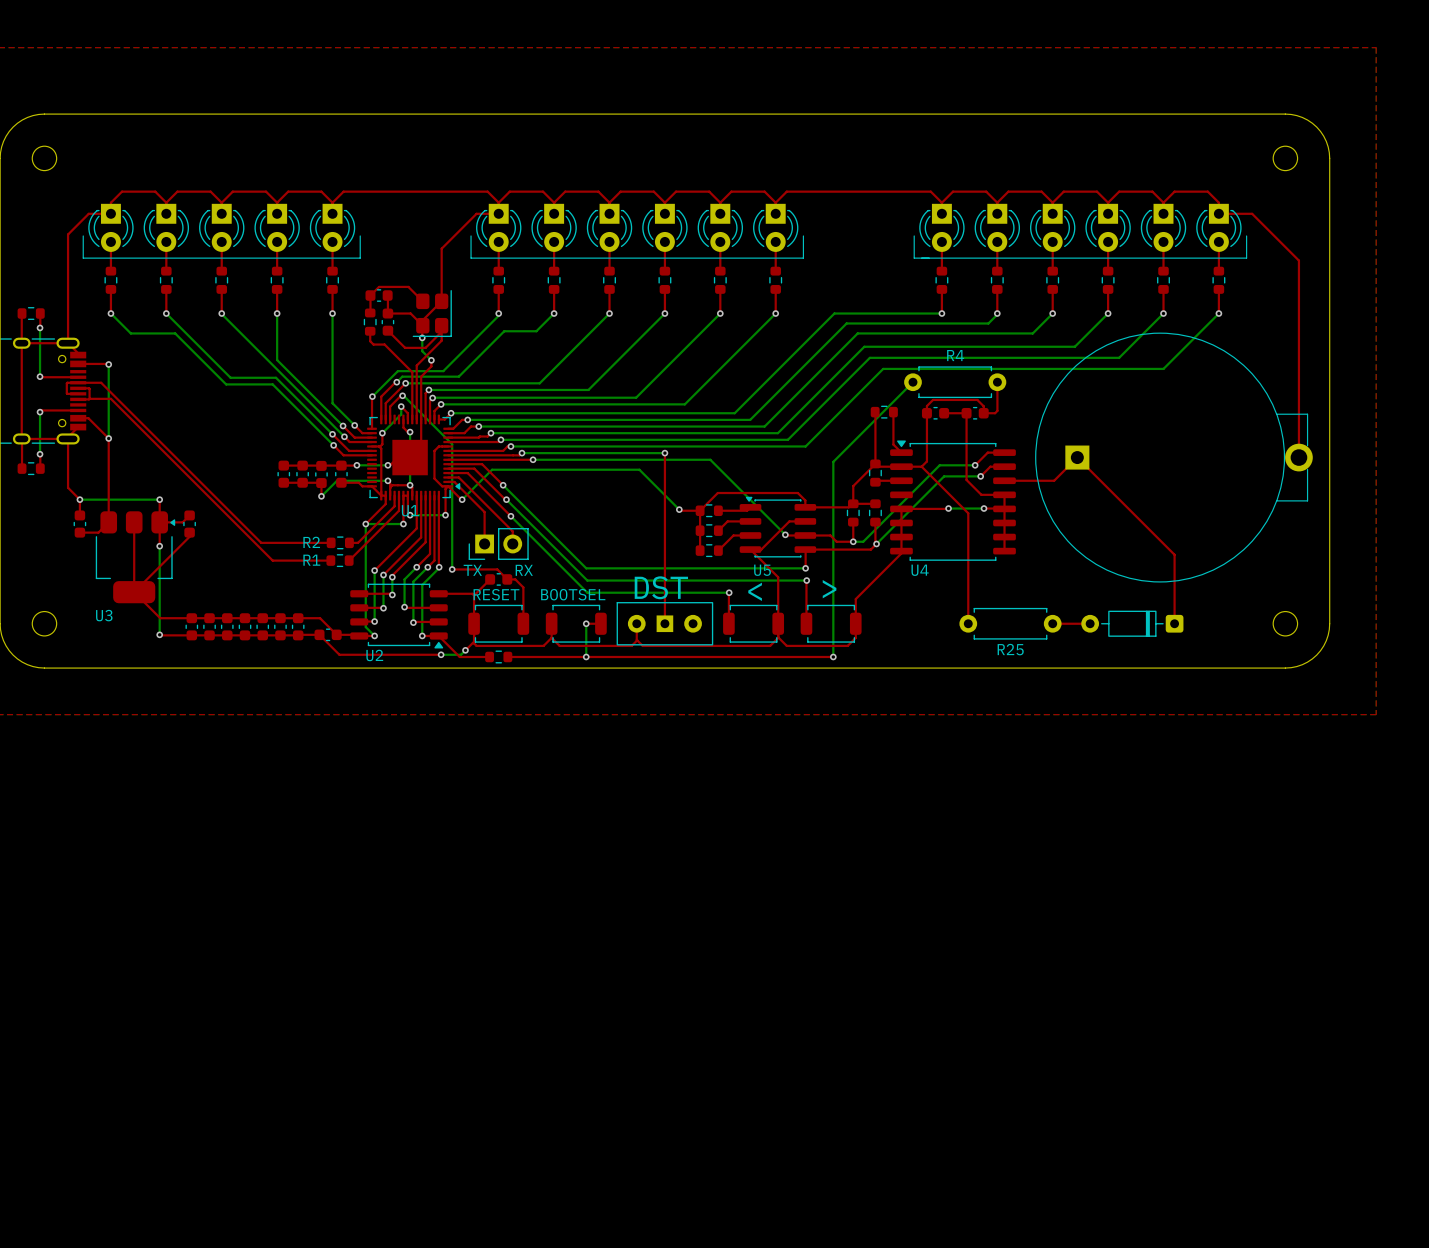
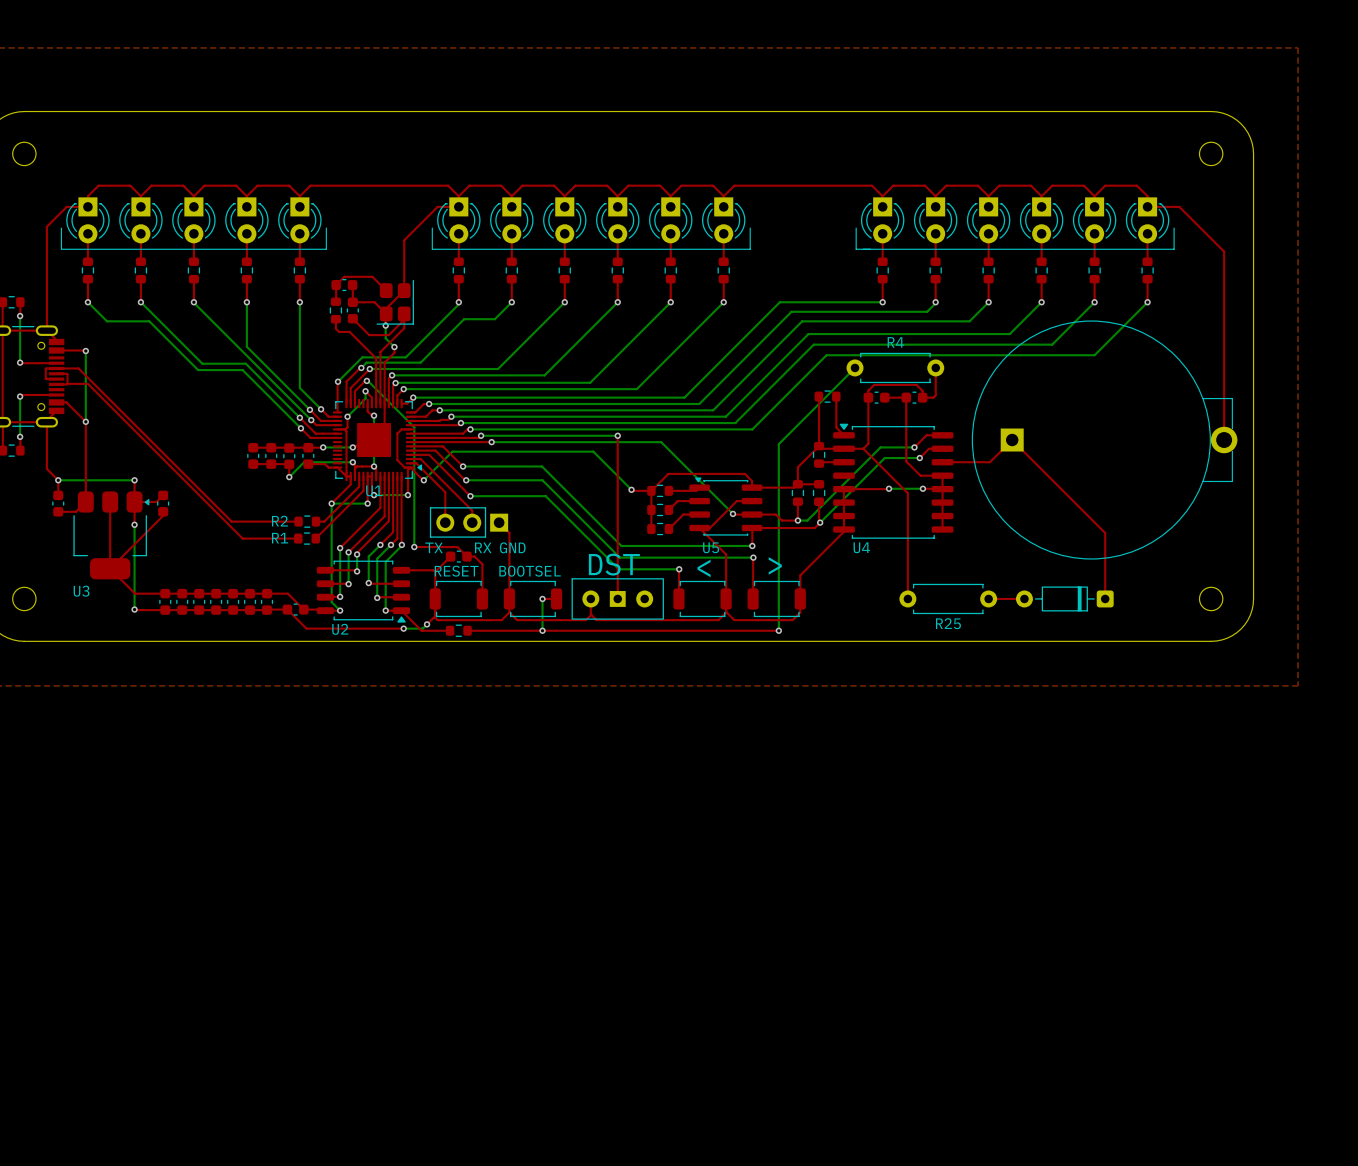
bottom track: (503, 485) (586, 568) (668, 568) -> (463, 466) (542, 466) (621, 545)
bottom track: (506, 499) (587, 580) (667, 580) -> (466, 480) (542, 480) (619, 557)
bottom track: (510, 516) (587, 592) (666, 592) -> (470, 496) (545, 496) (618, 569)
part footprint: [468, 528, 529, 560] -> [429, 507, 509, 538]
top track: none -> (499, 522) (509, 532) (509, 598)
text: none -> GND (512, 547)

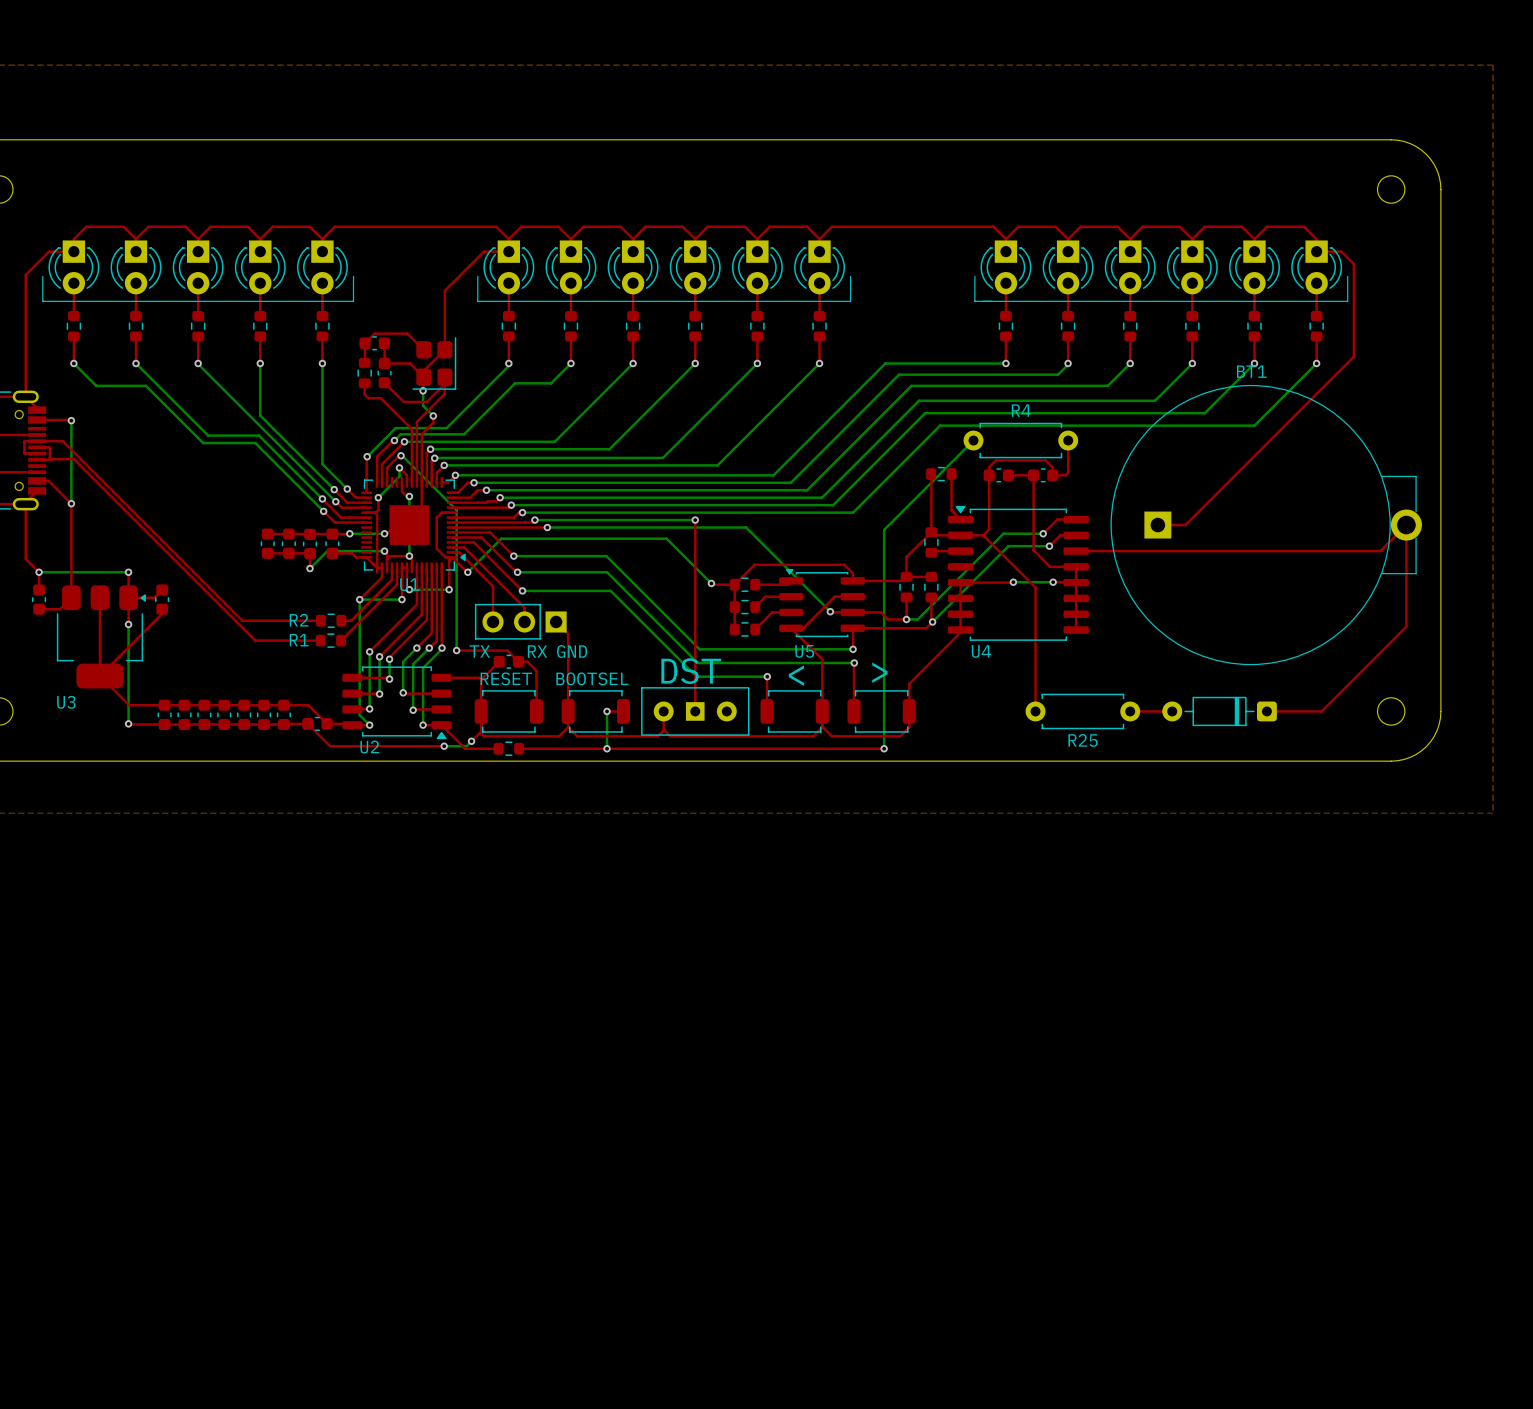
top track: (1168, 206) (1179, 206) (1224, 251) (1224, 440) -> (1341, 251) (1353, 264) (1353, 356) (1185, 525) (1157, 525)
BT1 name: none -> BT1 (1251, 371)
top track: (990, 462) (1012, 440) (1105, 533) (1105, 598) -> (1131, 551) (1380, 551) (1406, 525) (1406, 626) (1321, 711) (1266, 711)

